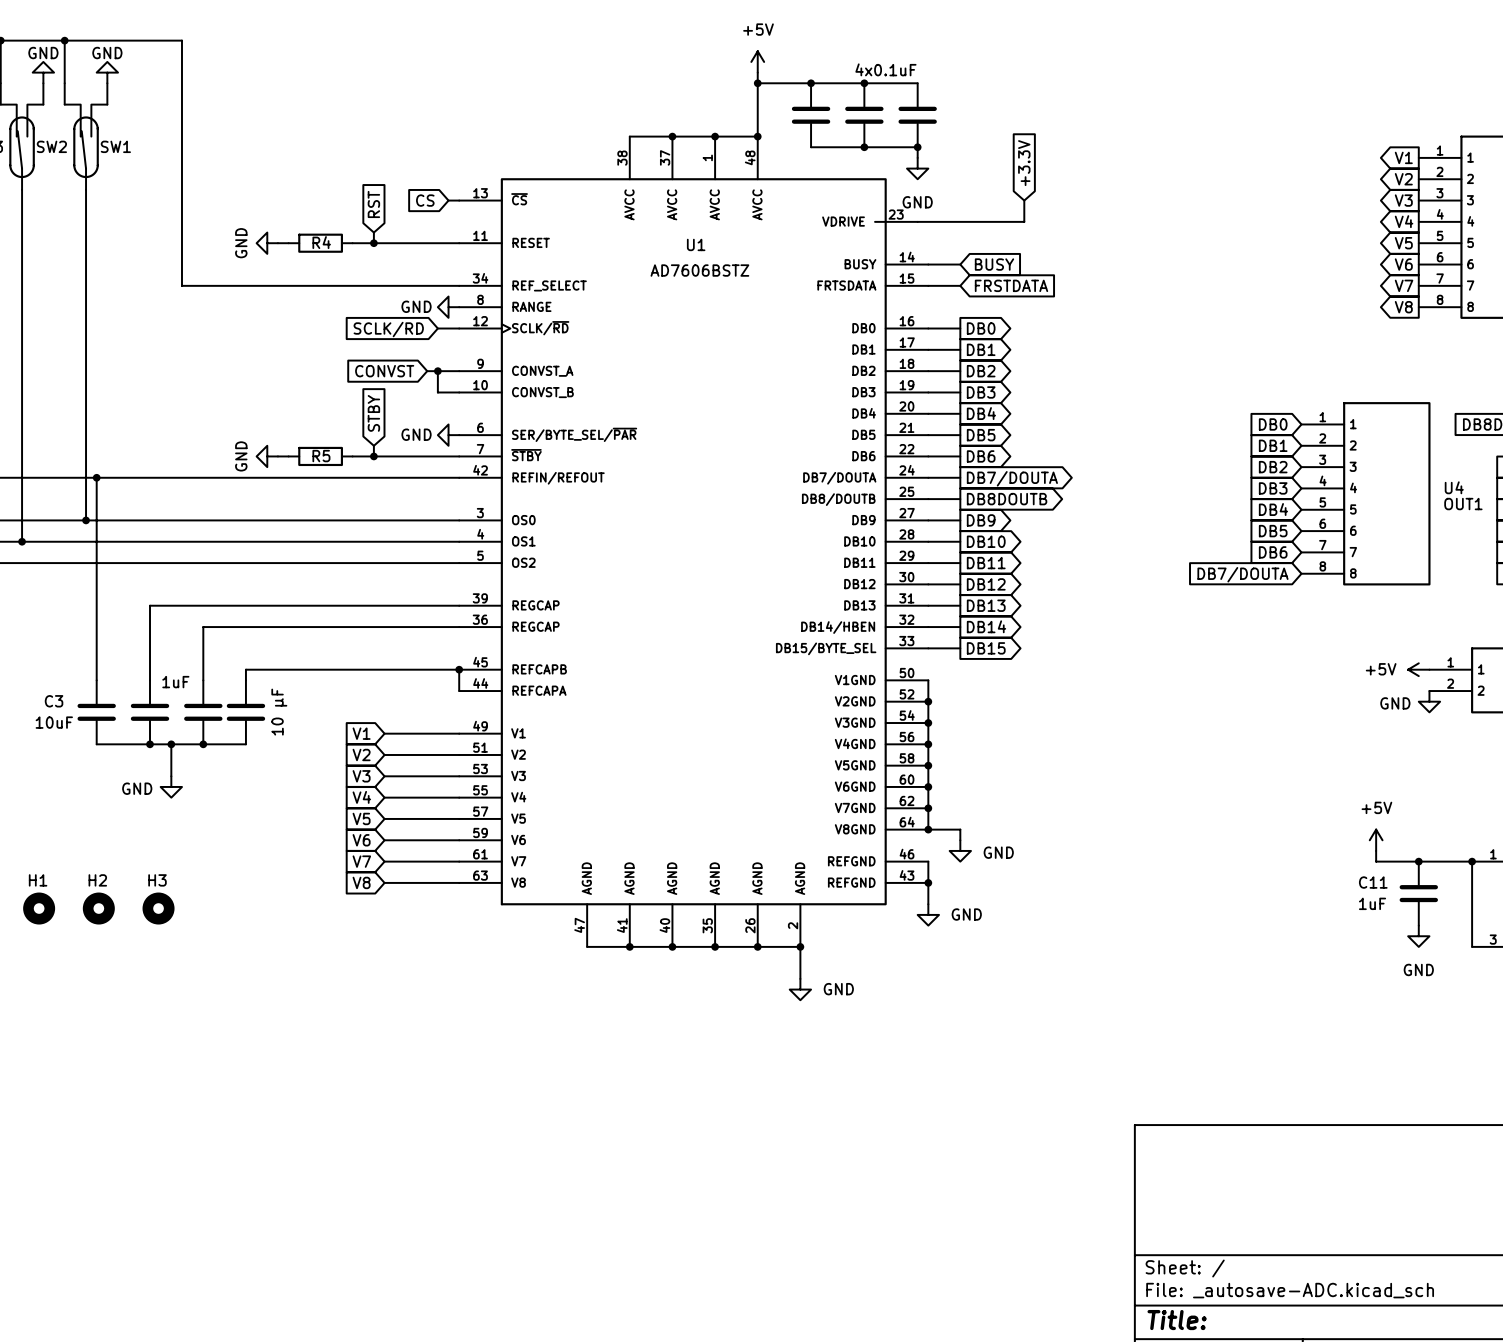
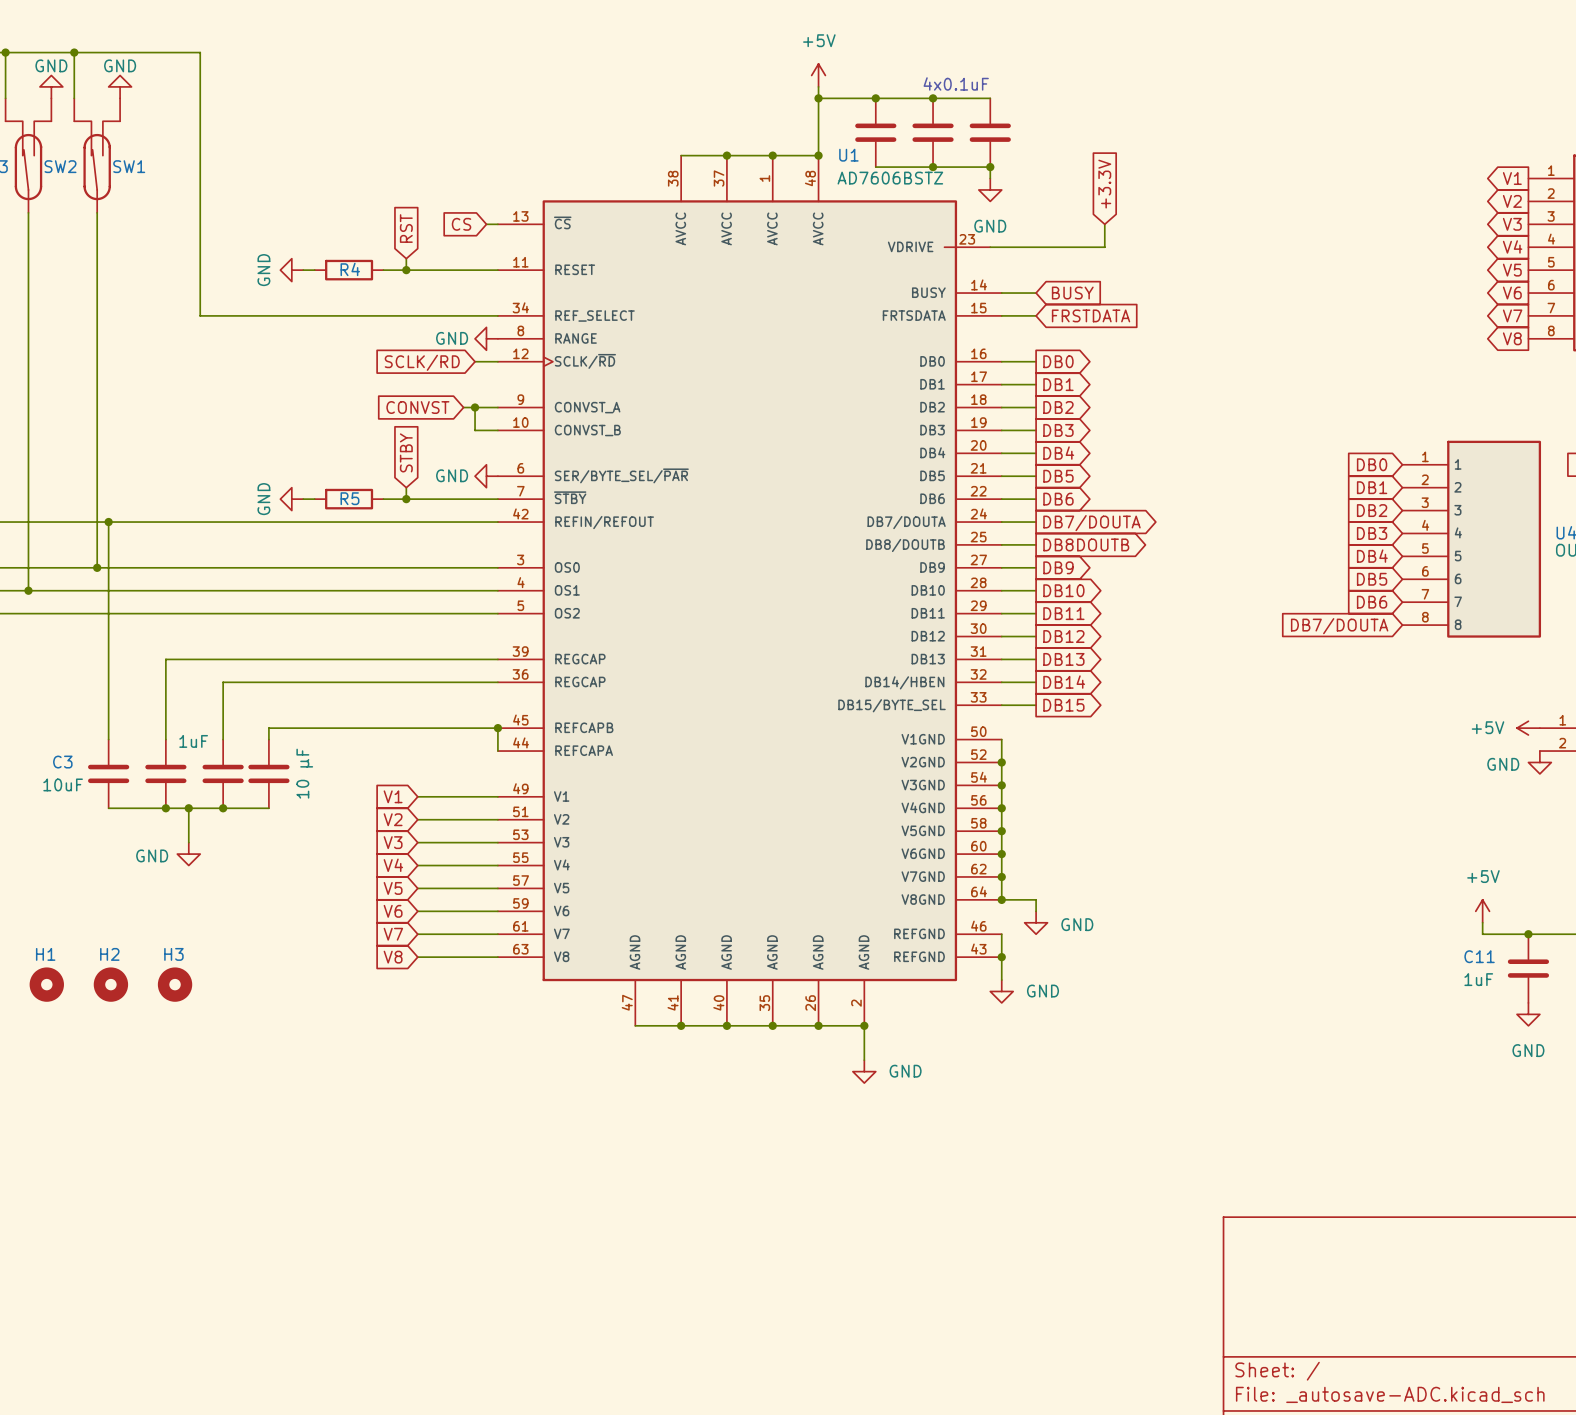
U1 name position: U1 (696, 244) -> U1 (848, 155)
U1 value position: AD7606BSTZ (699, 270) -> AD7606BSTZ (890, 178)

